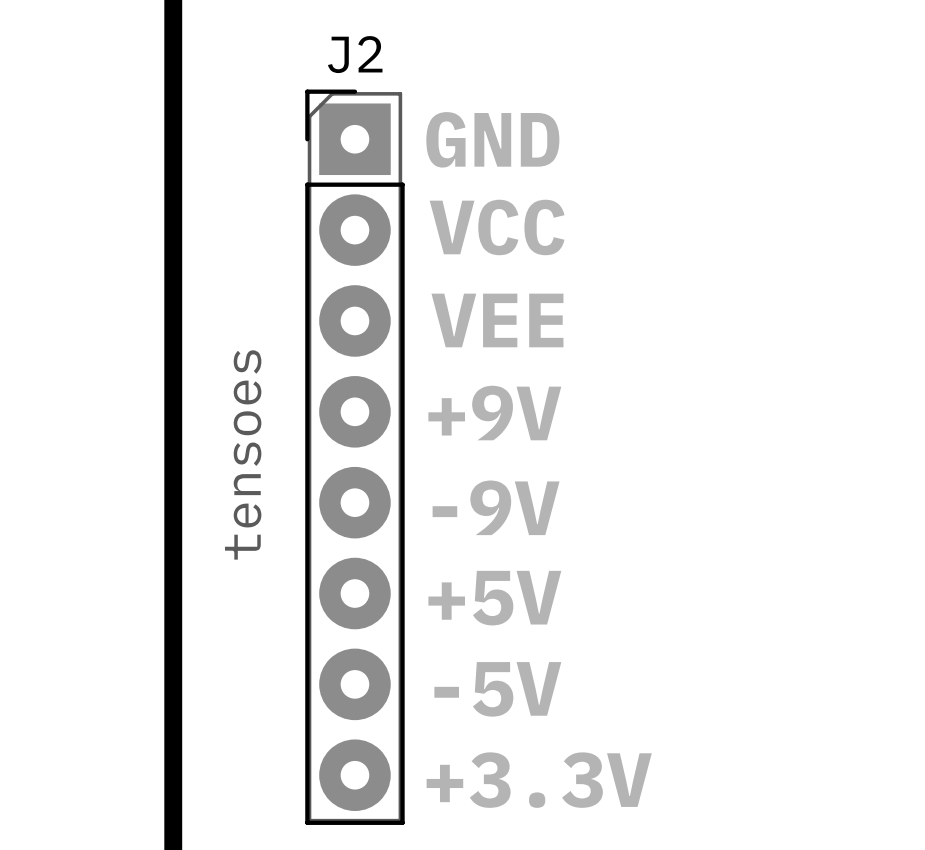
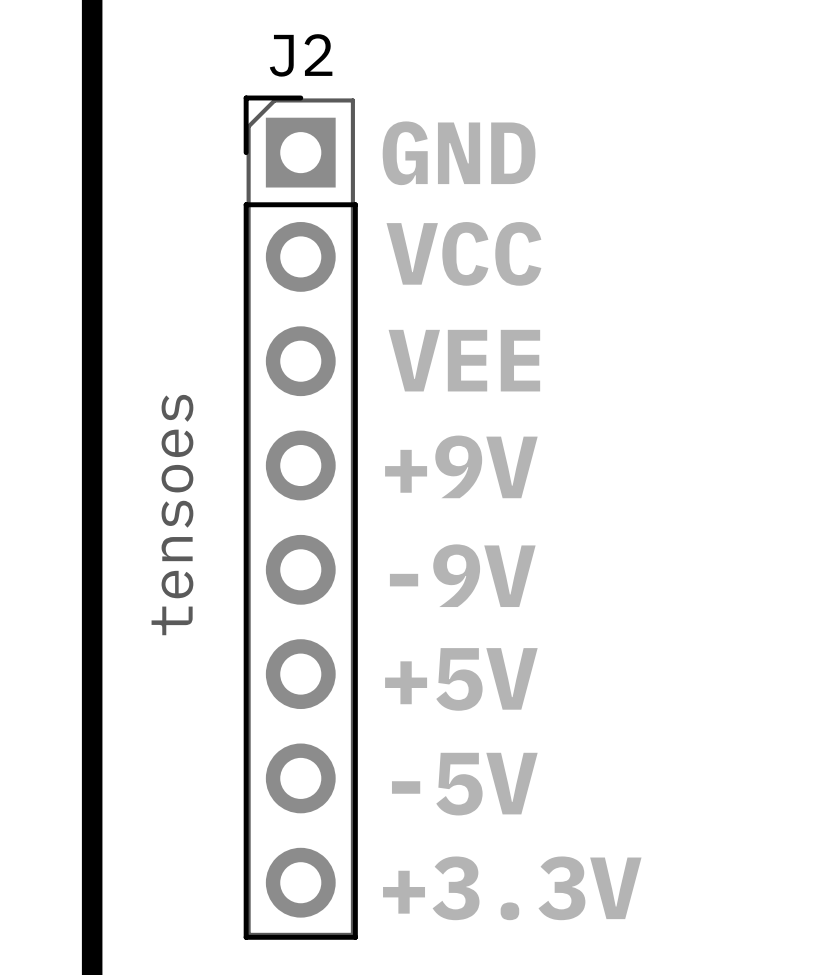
J2 footprint: [305, 89, 405, 825] -> [243, 95, 358, 940]

